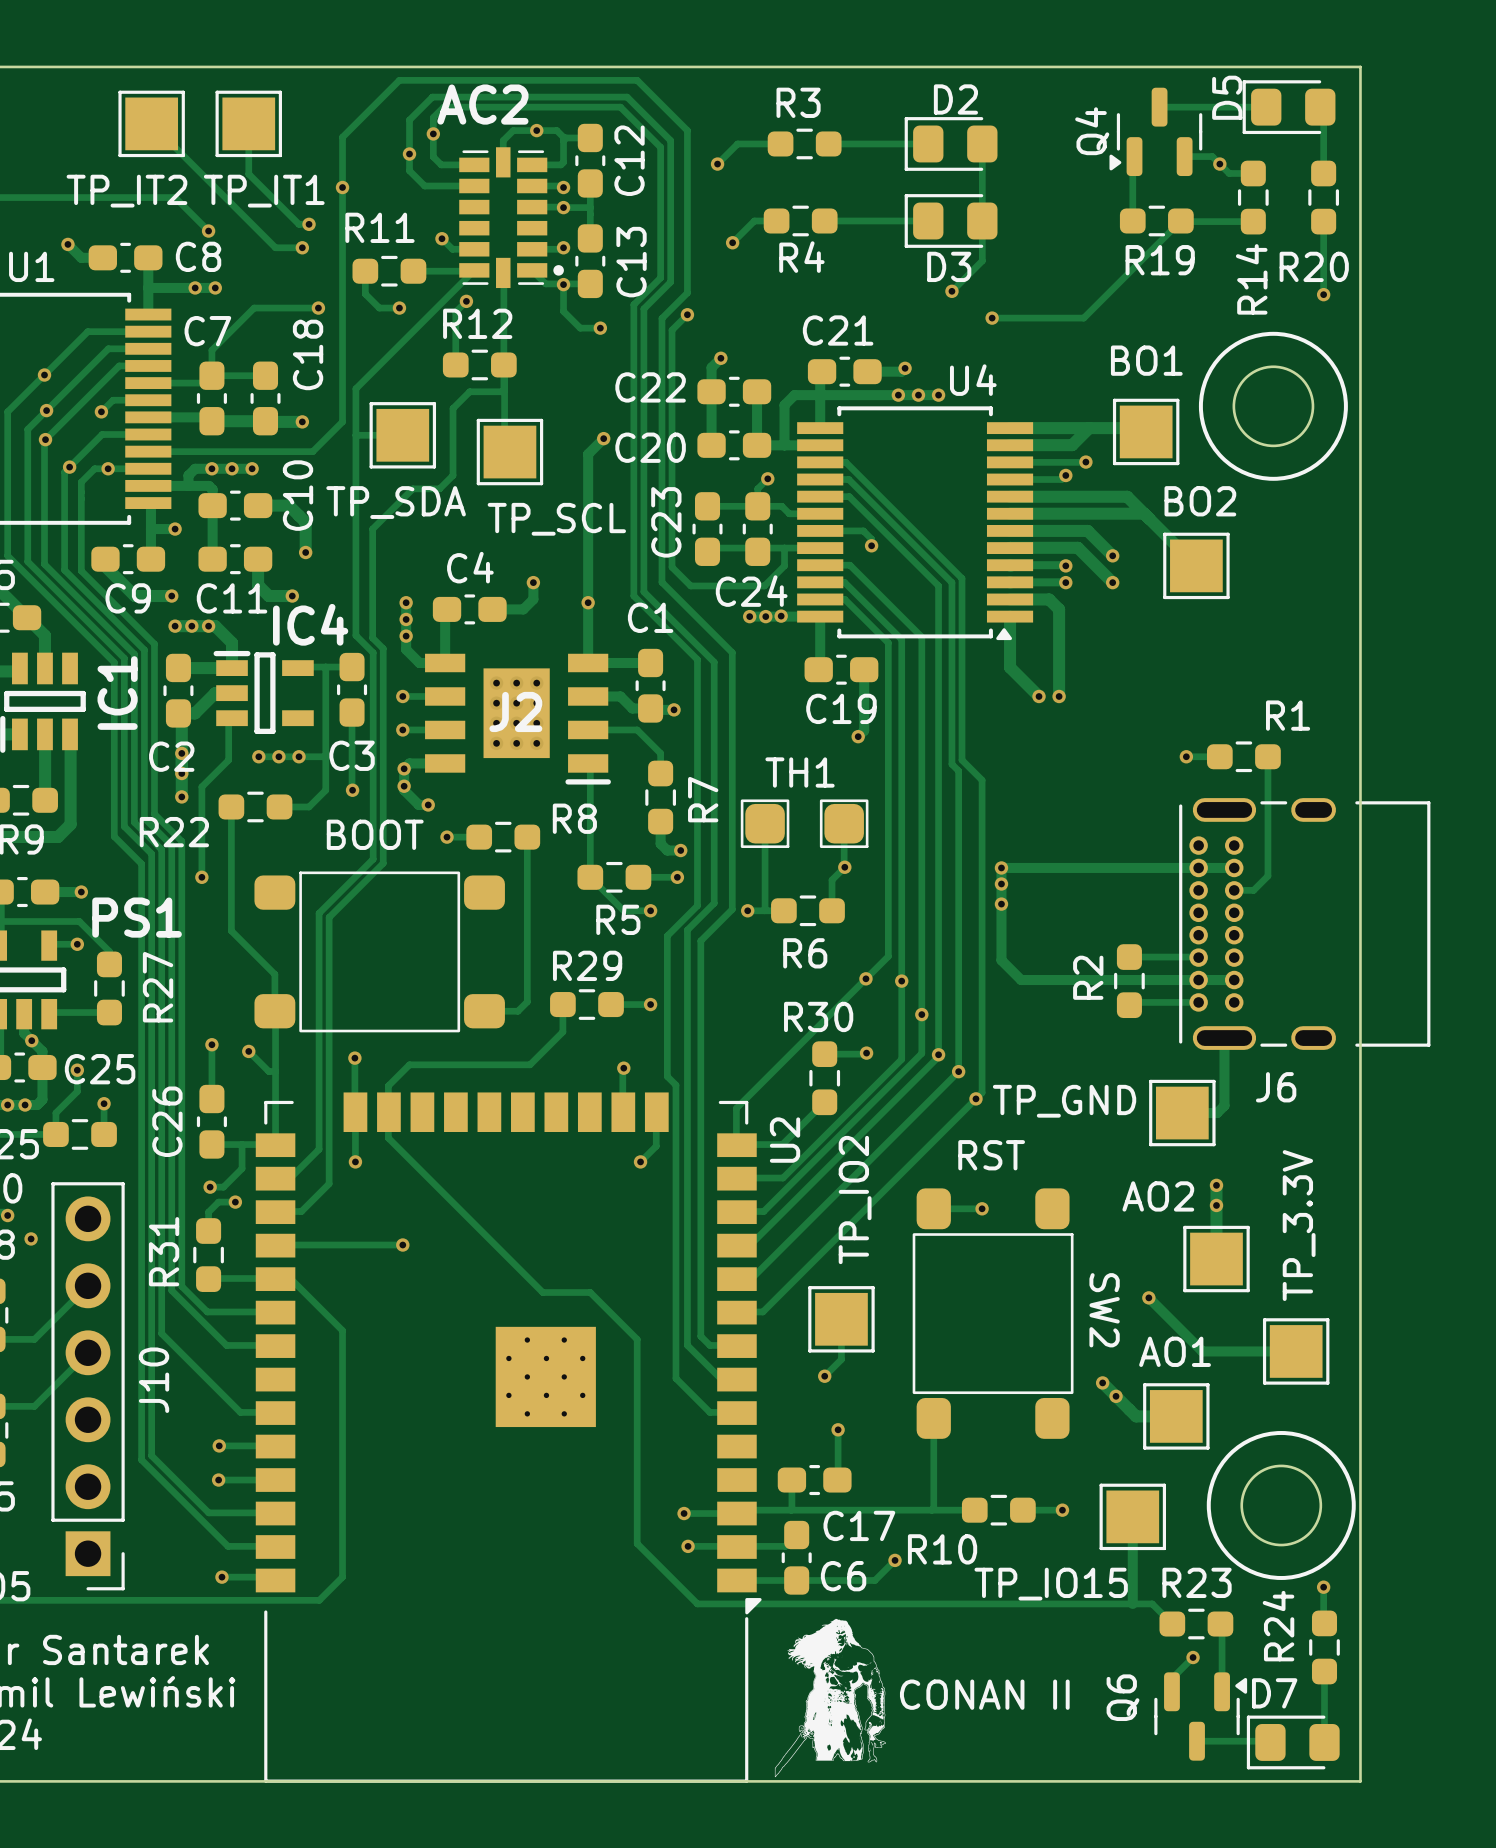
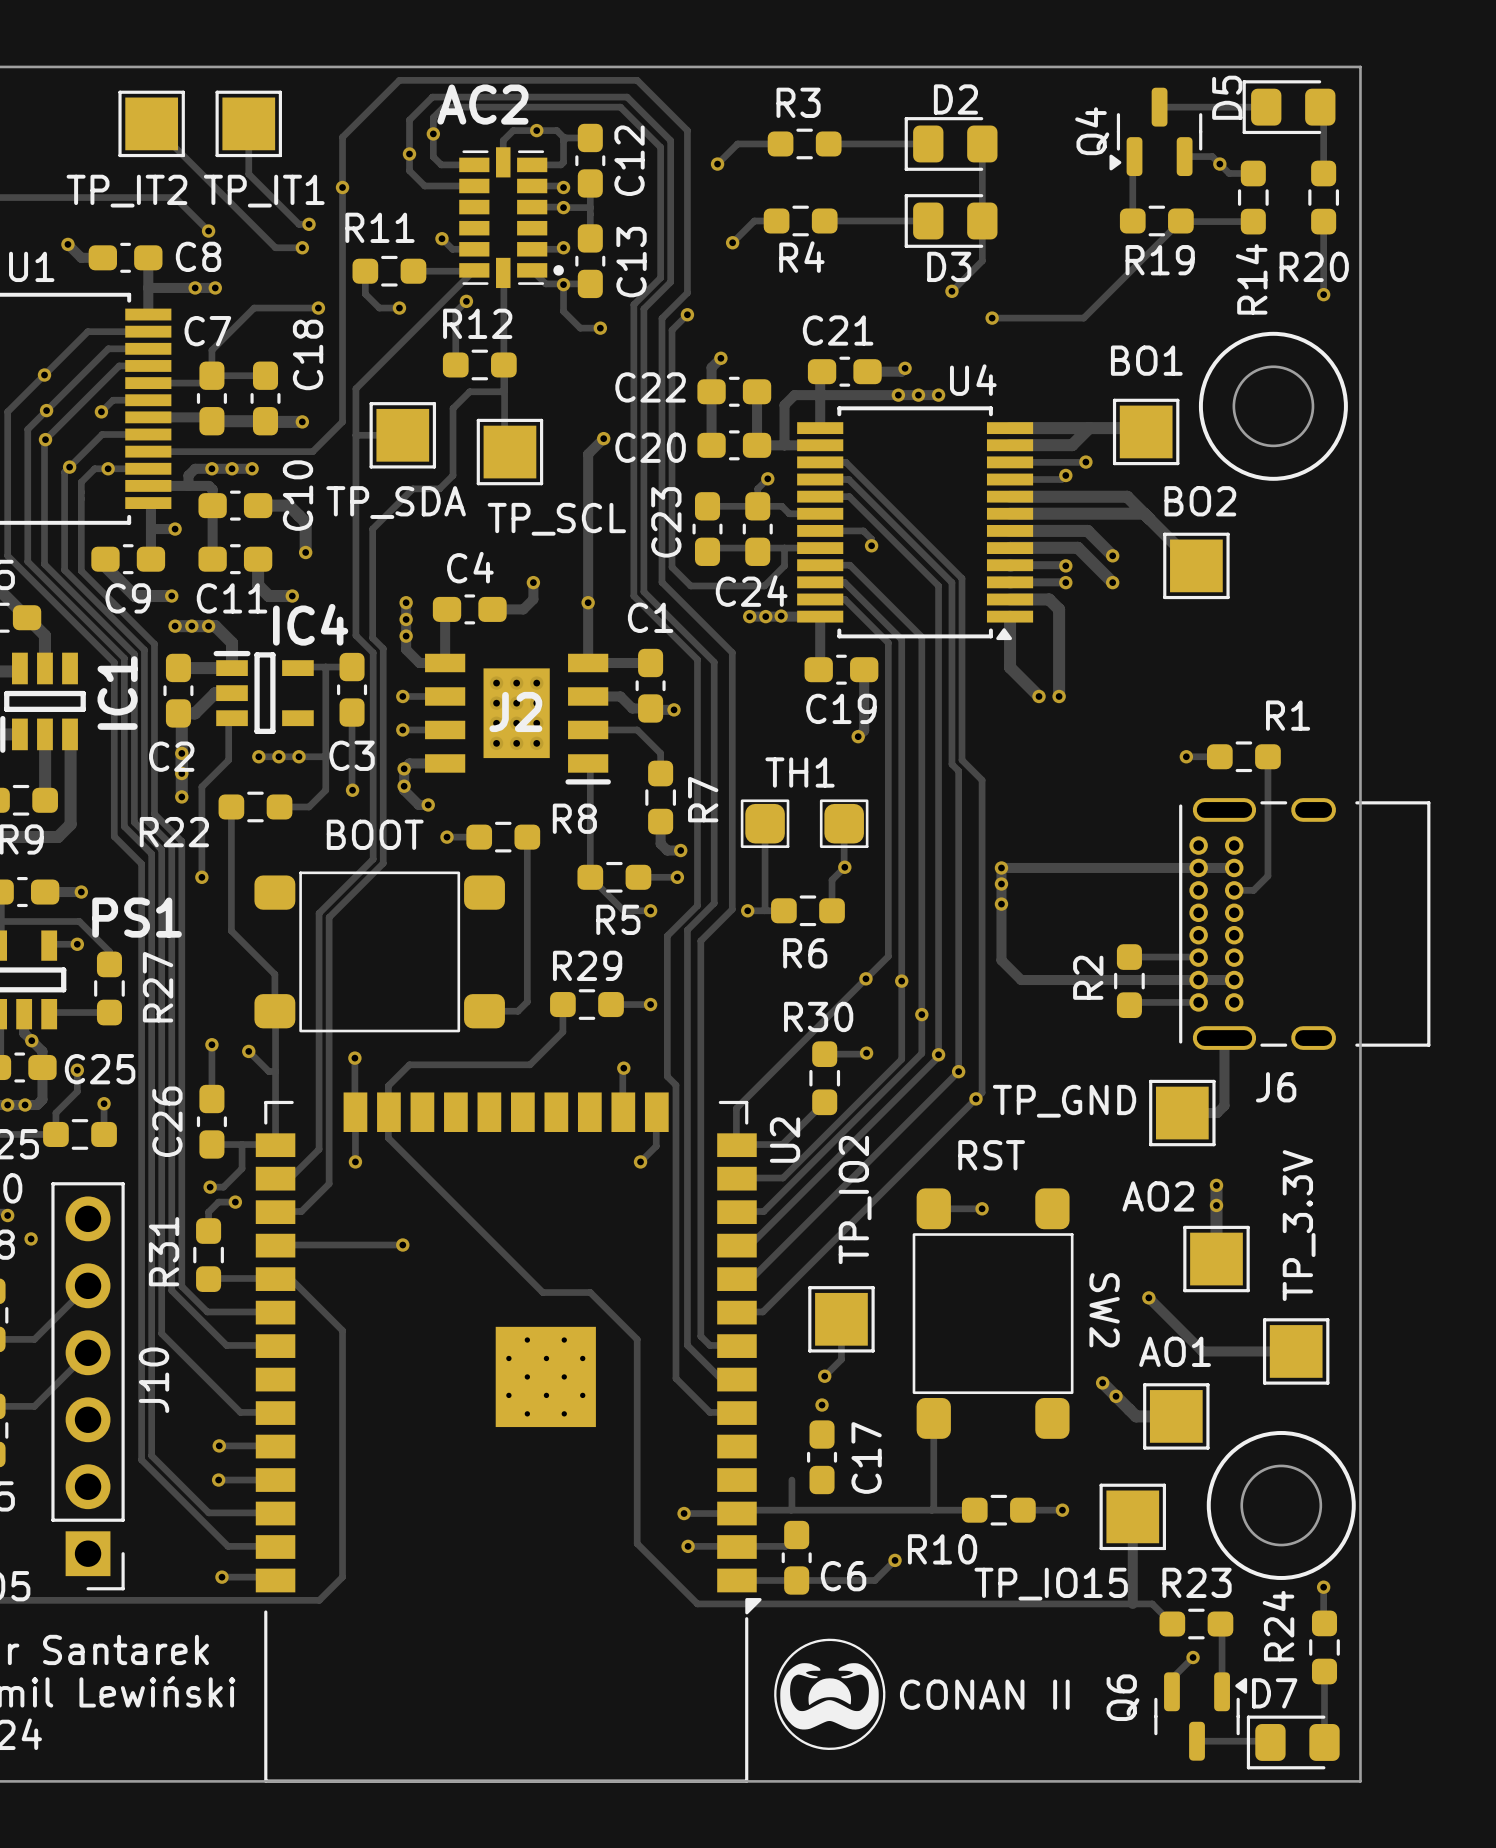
track: (838, 1429) (837, 1480) -> none
via position: (838, 1429) -> (822, 1405)
C17 rotation: 0° (814, 1480) -> 90° clockwise (822, 1457)
drawing shape: [774, 1618, 886, 1778] -> [774, 1638, 886, 1751]

